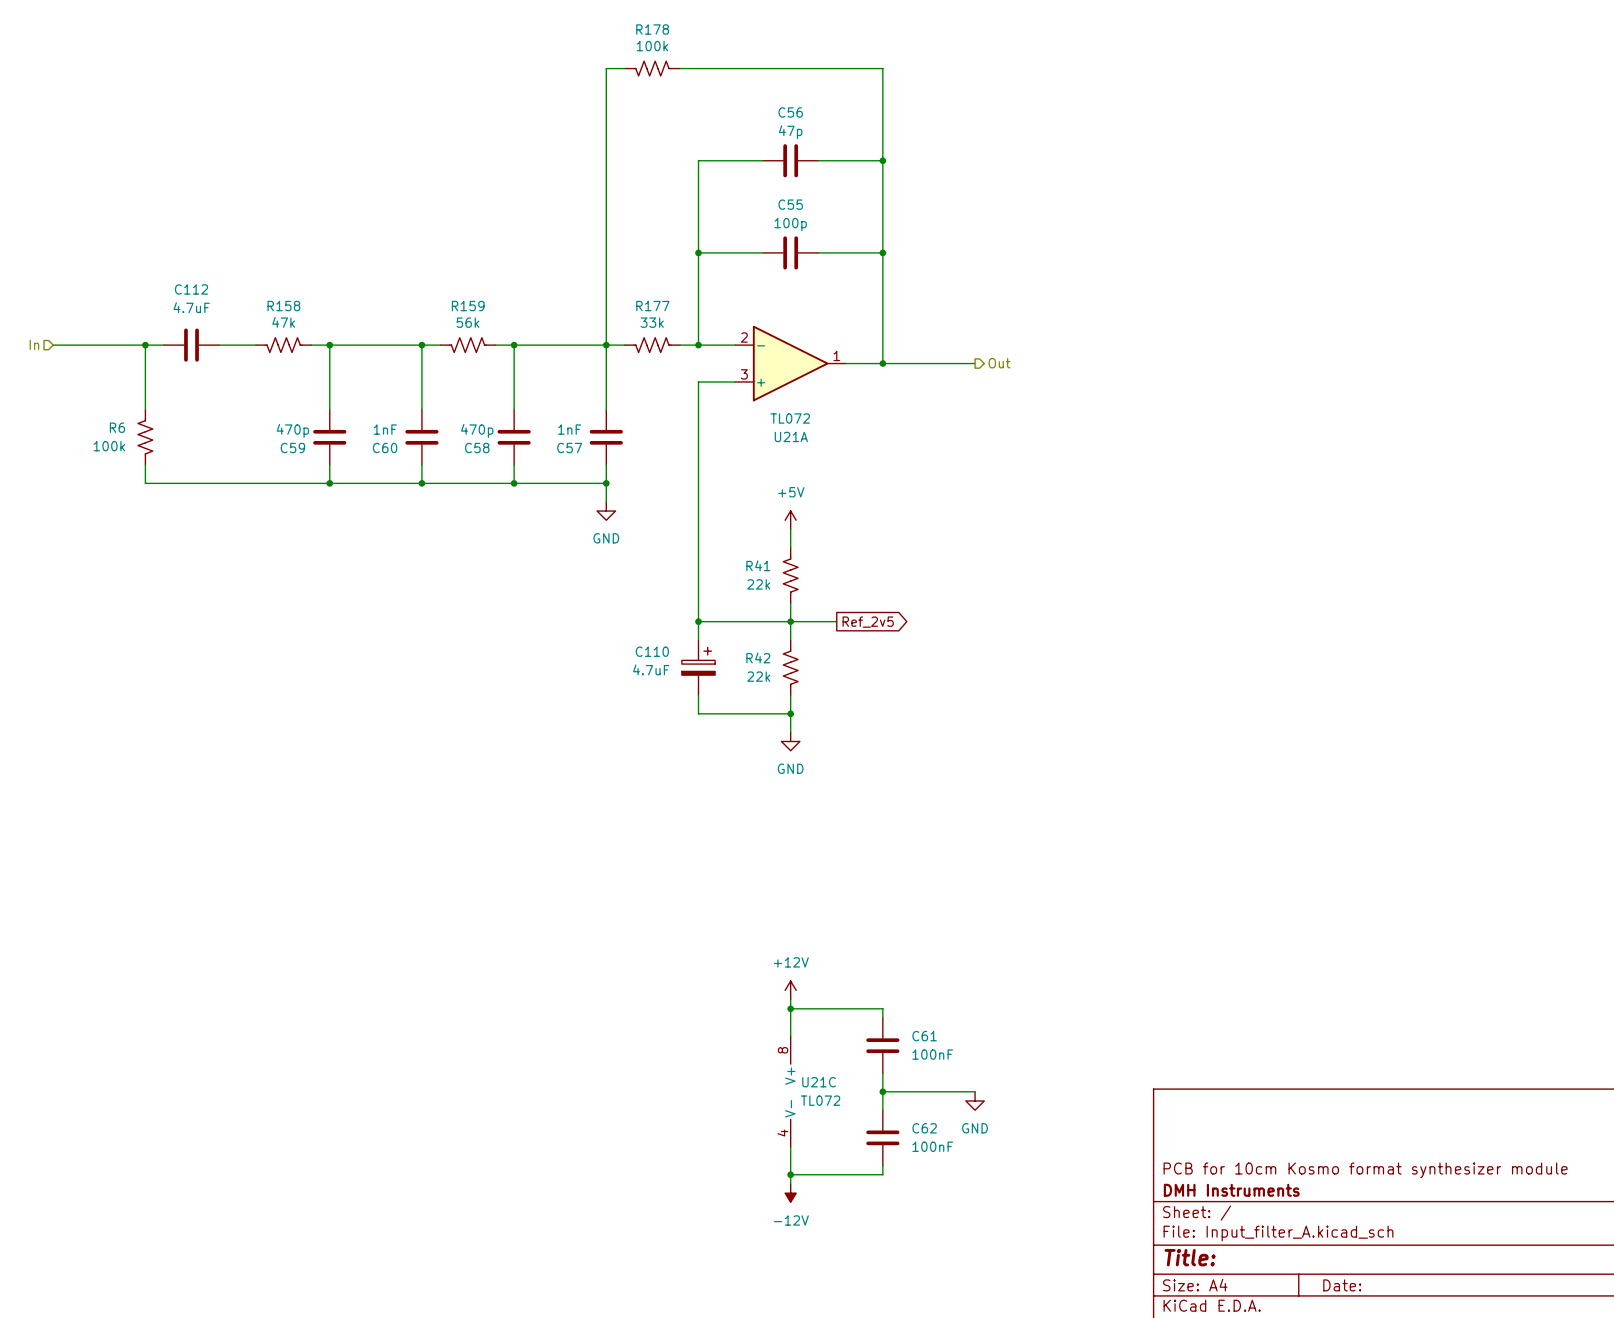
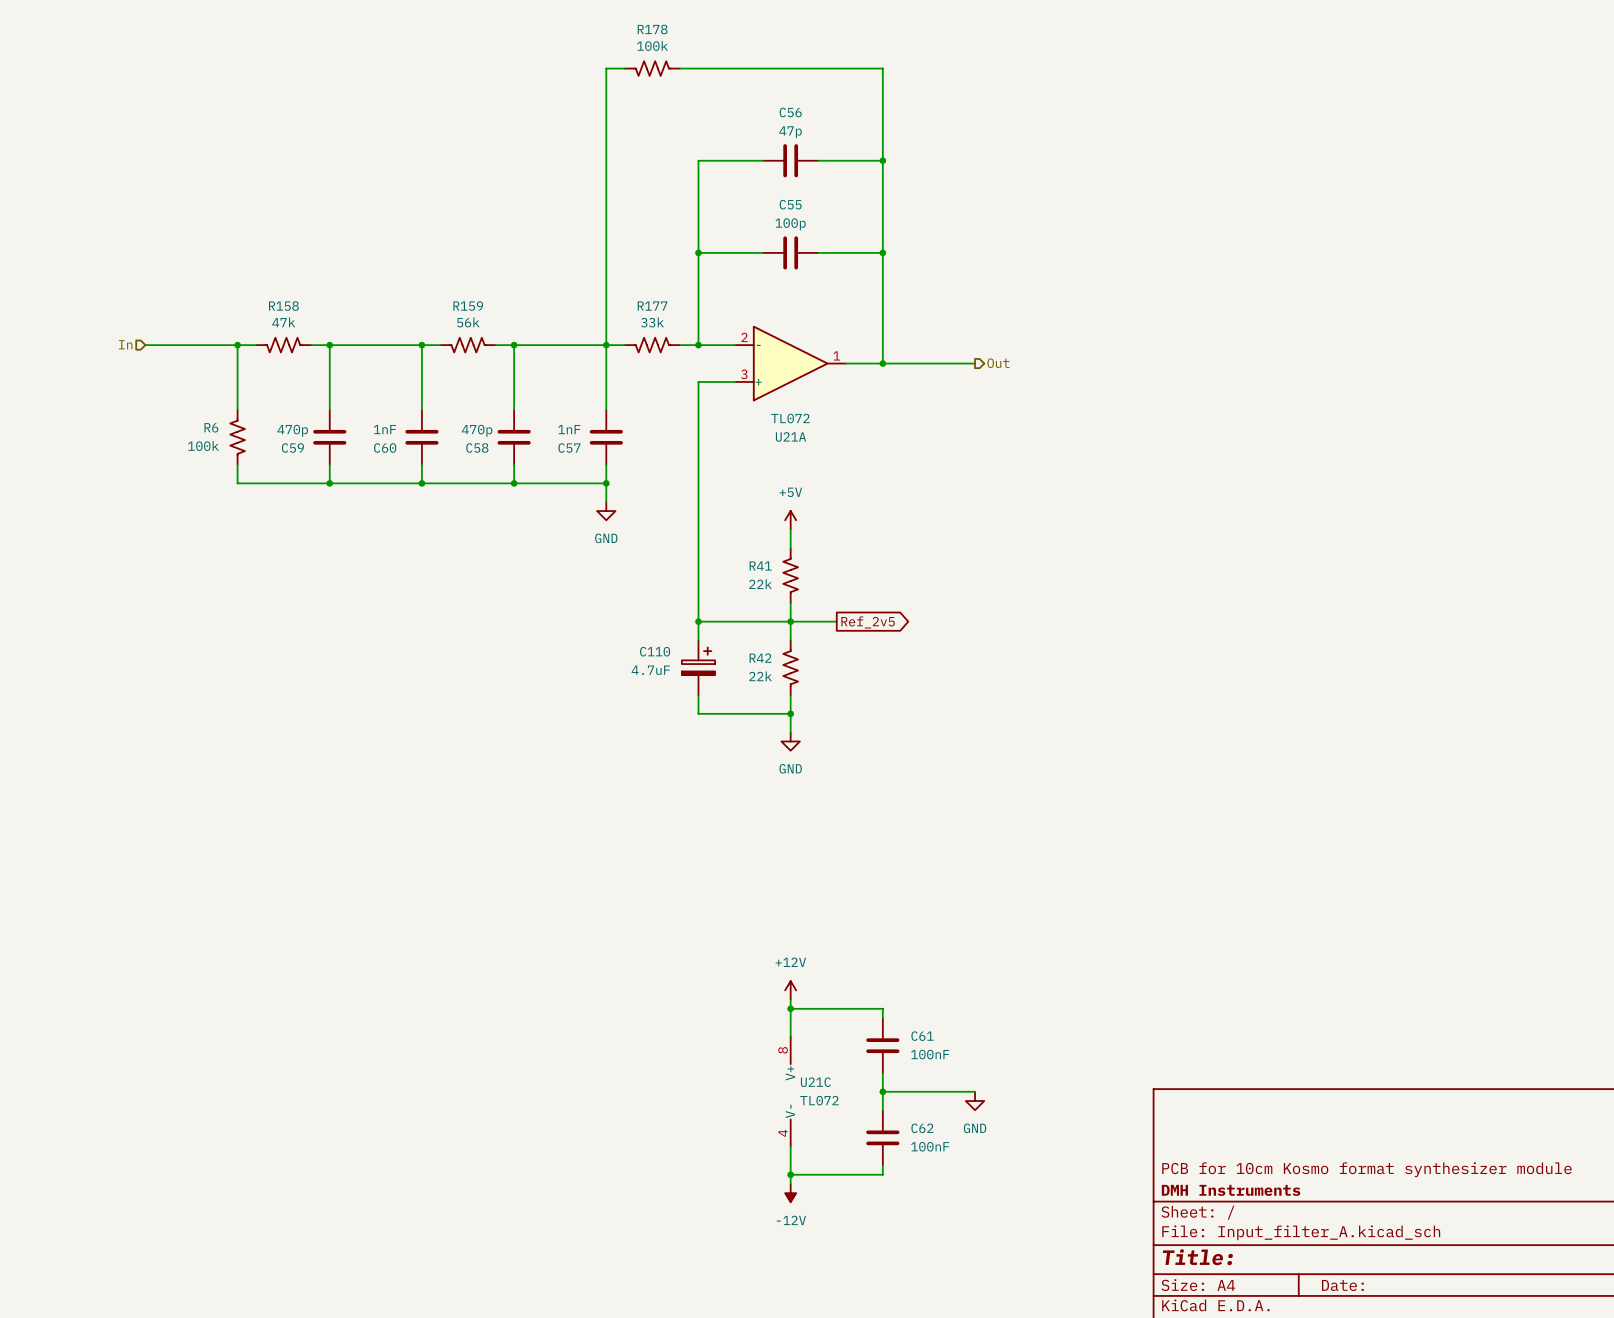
hierarchical label position: In (34, 344) -> In (125, 344)
wire: (53, 345) (145, 345) (145, 409) -> none
junction: (145, 345) -> none
C112: 4.7uF (191, 345) -> none
wire: none -> (237, 345) (237, 409)
junction: none -> (237, 345)
R6 position: (145, 437) -> (237, 437)
wire: (145, 464) (145, 483) (237, 483) -> (237, 464) (237, 483)

